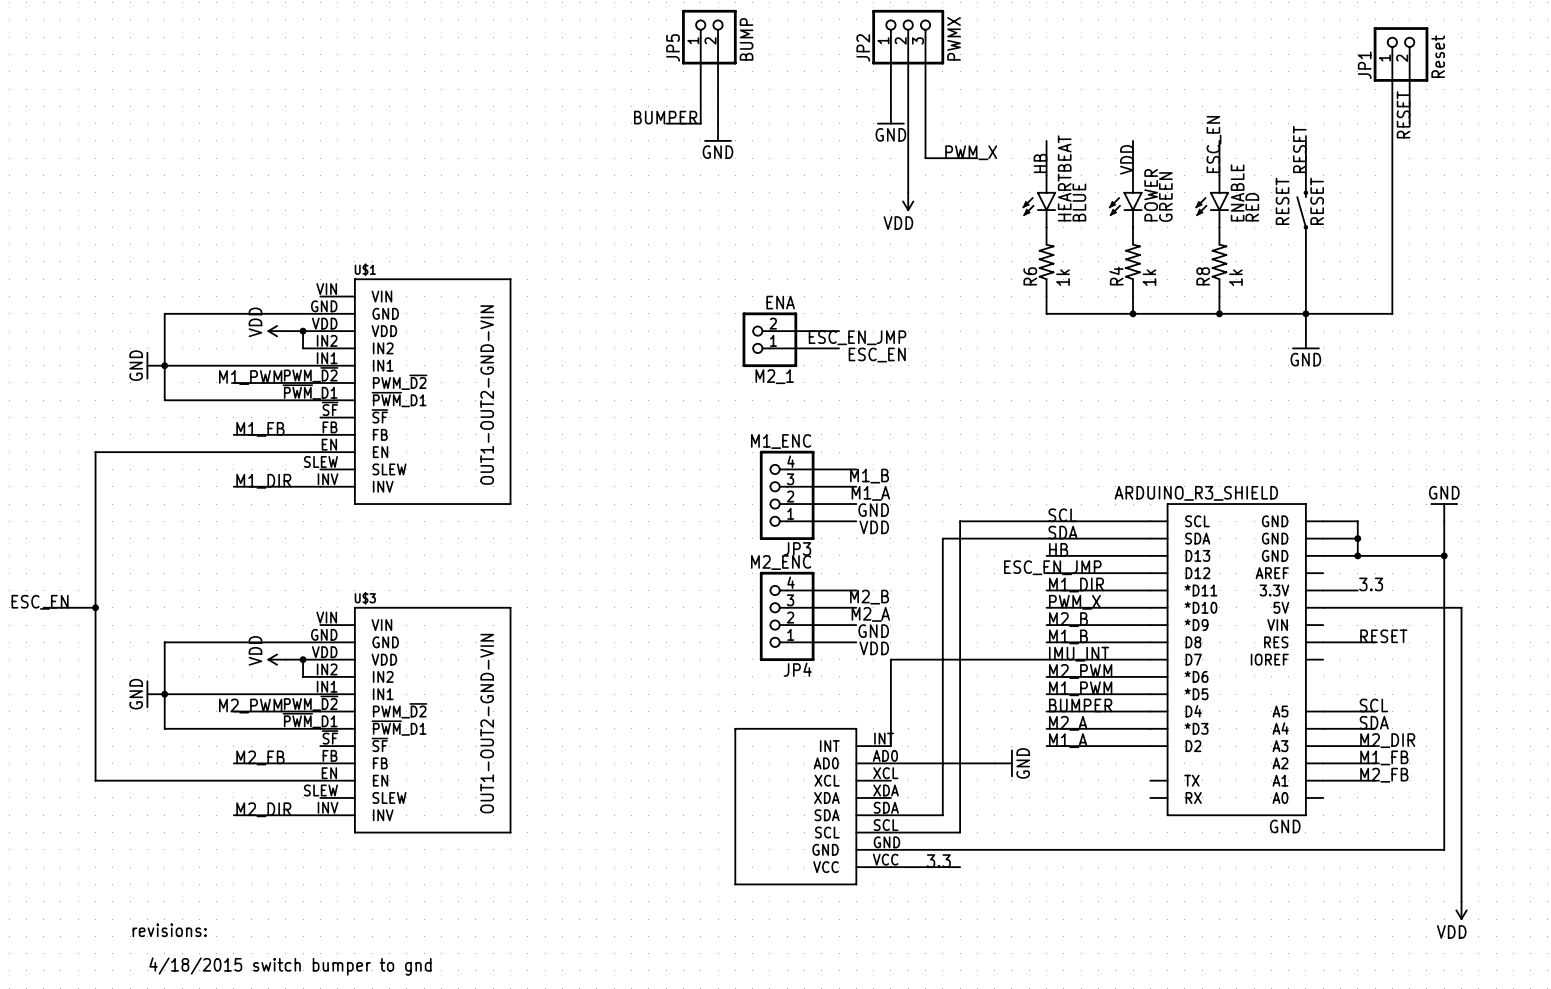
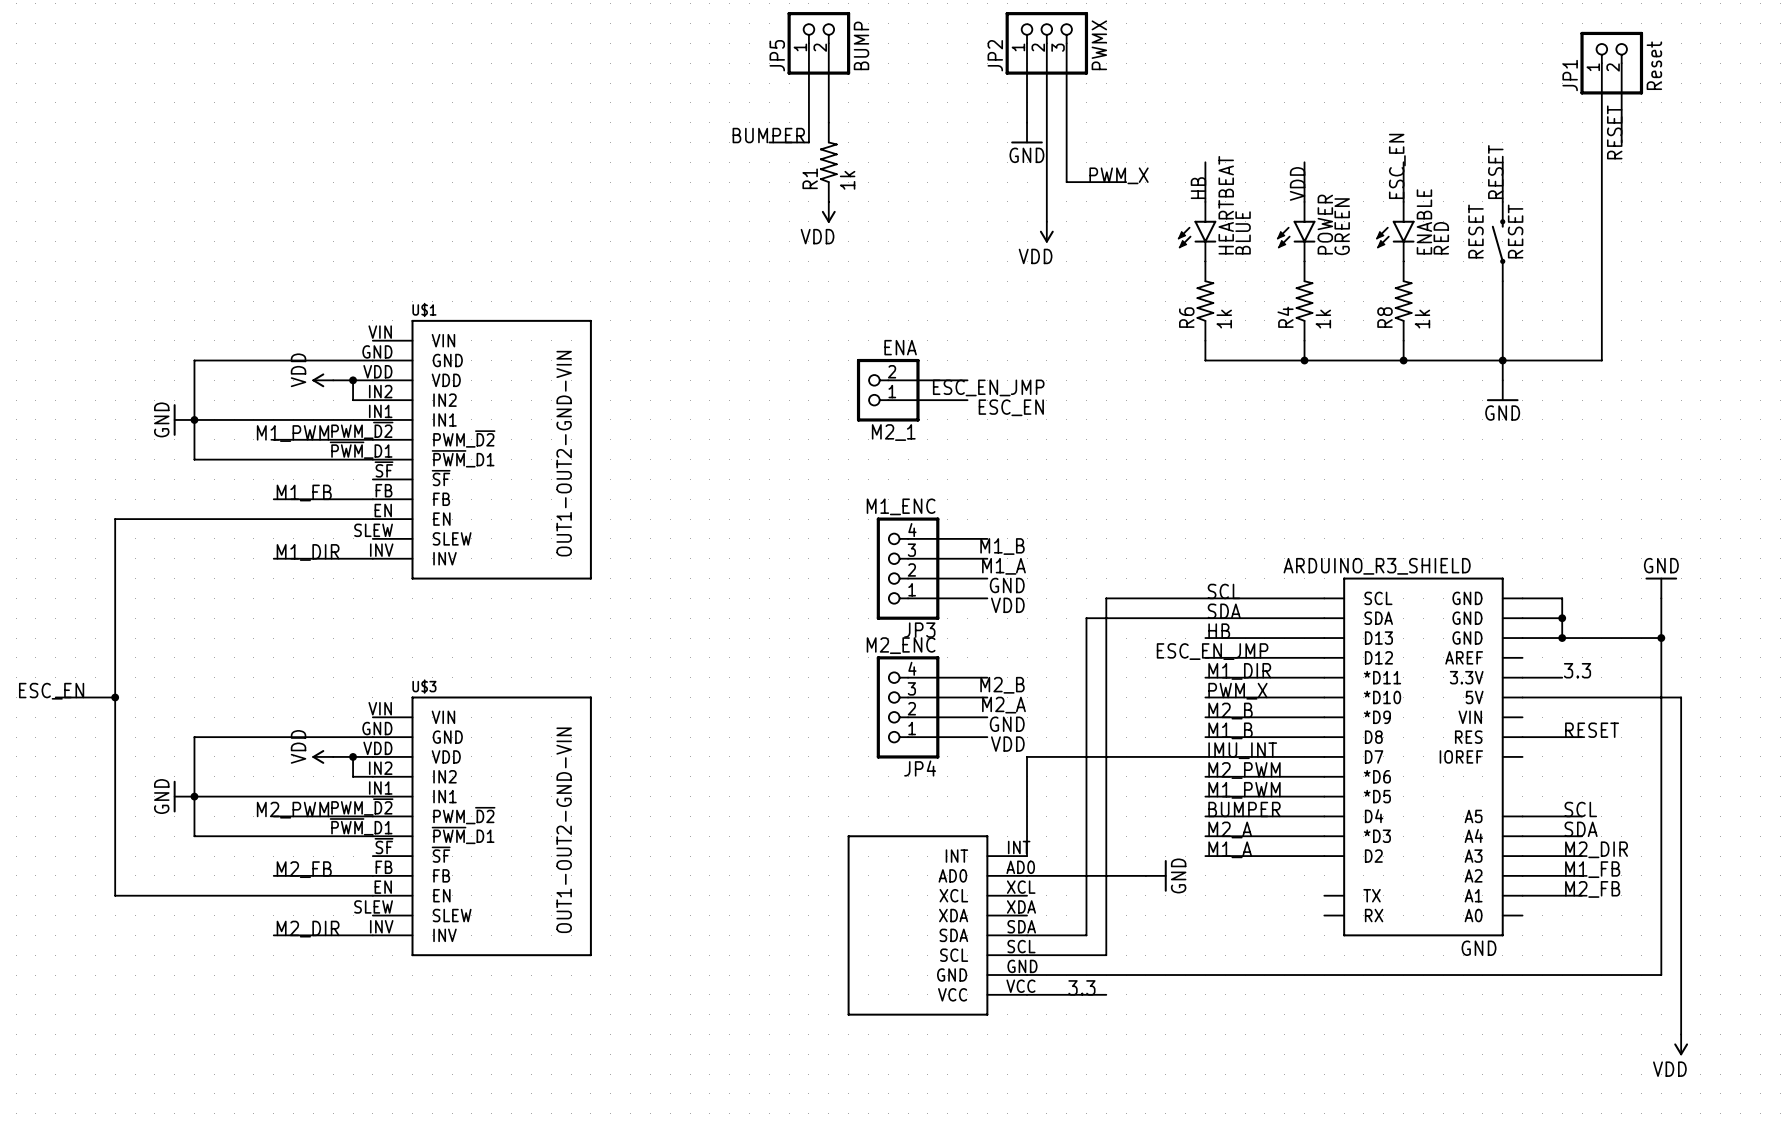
power symbol: GND (718, 132) -> none
R1: none -> 1k (828, 162)
power symbol: none -> VDD (828, 212)
text: revisions: (169, 930) -> none
text: 4/18/2015 switch bumper to gnd (290, 966) -> none

